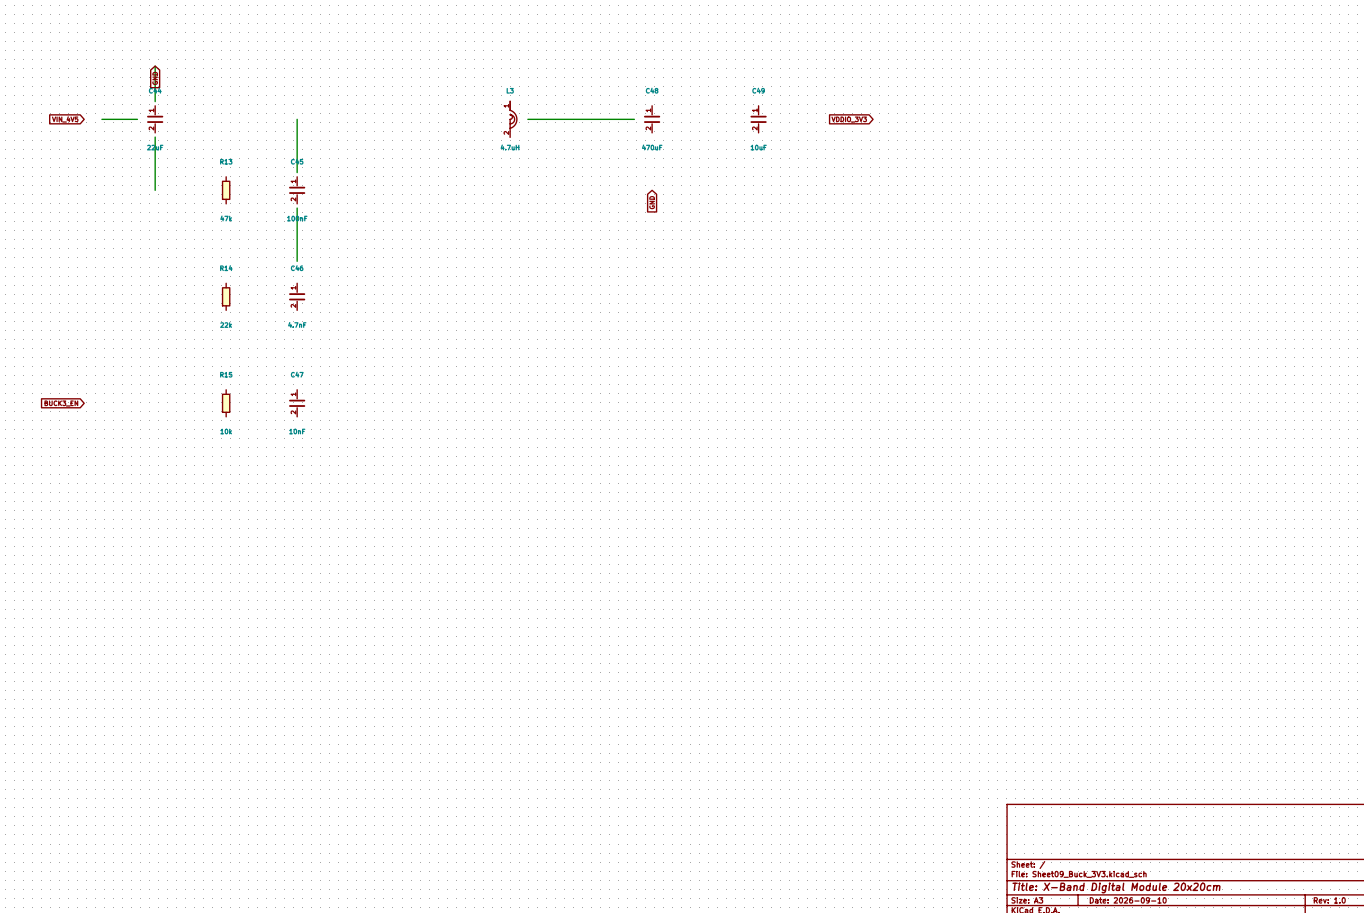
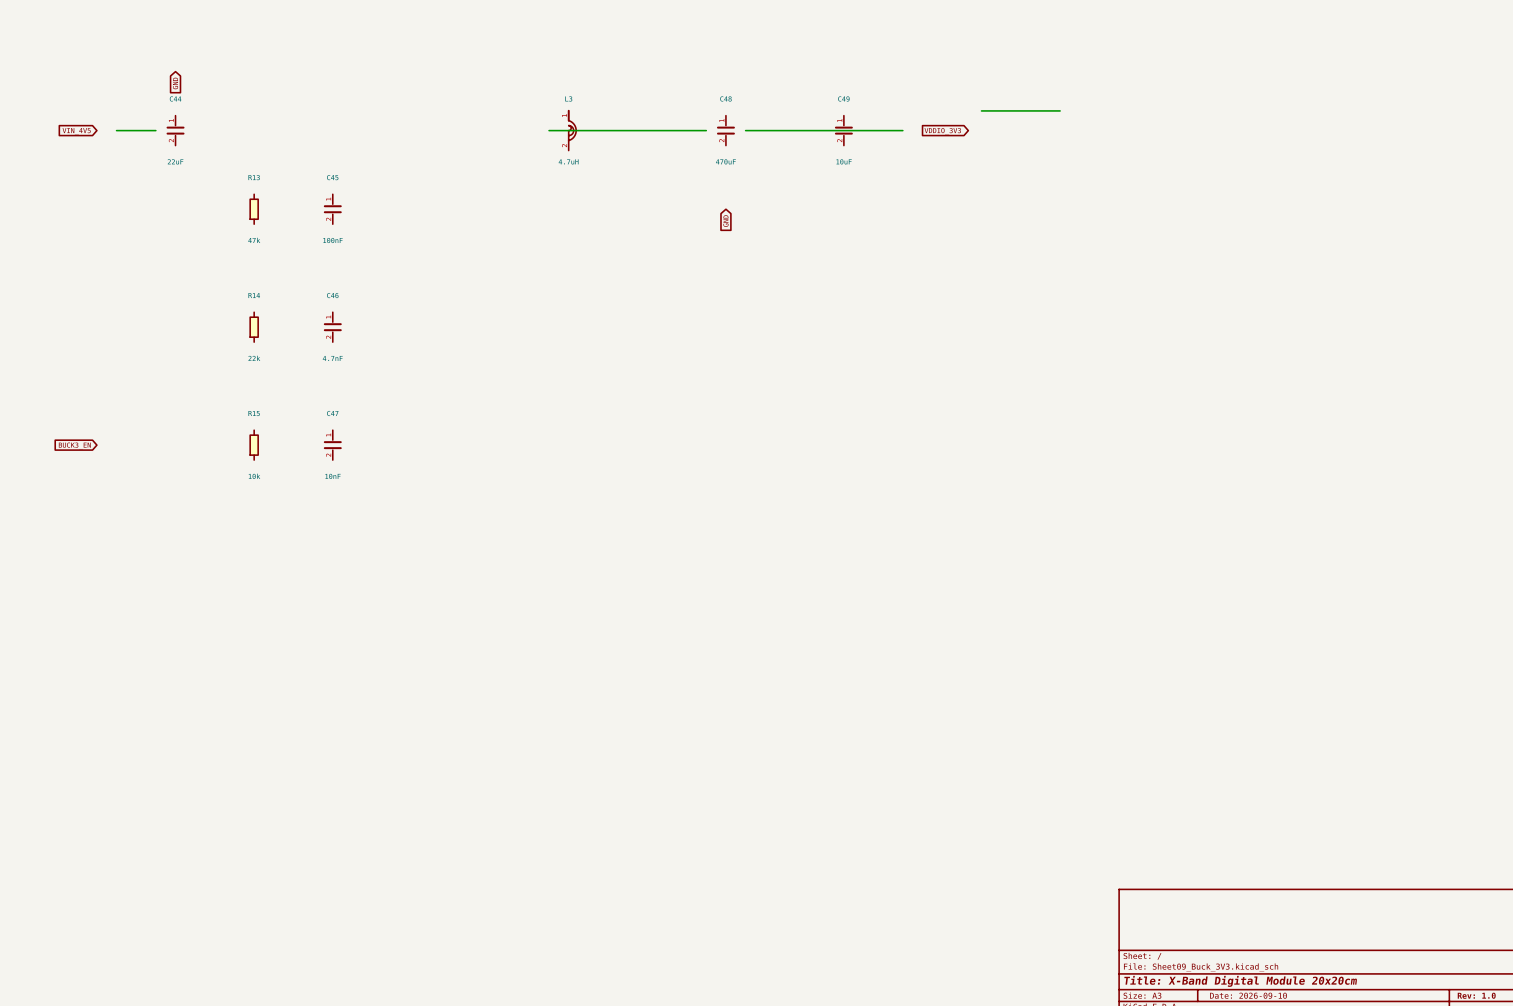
wire: (155, 66) (155, 101) -> none
wire: none -> (981, 110) (1060, 110)
wire: (297, 119) (297, 172) -> none
wire: none -> (549, 130) (588, 130)
wire: none -> (745, 130) (902, 130)
wire: (155, 137) (155, 190) -> none
wire: (297, 208) (297, 261) -> none

